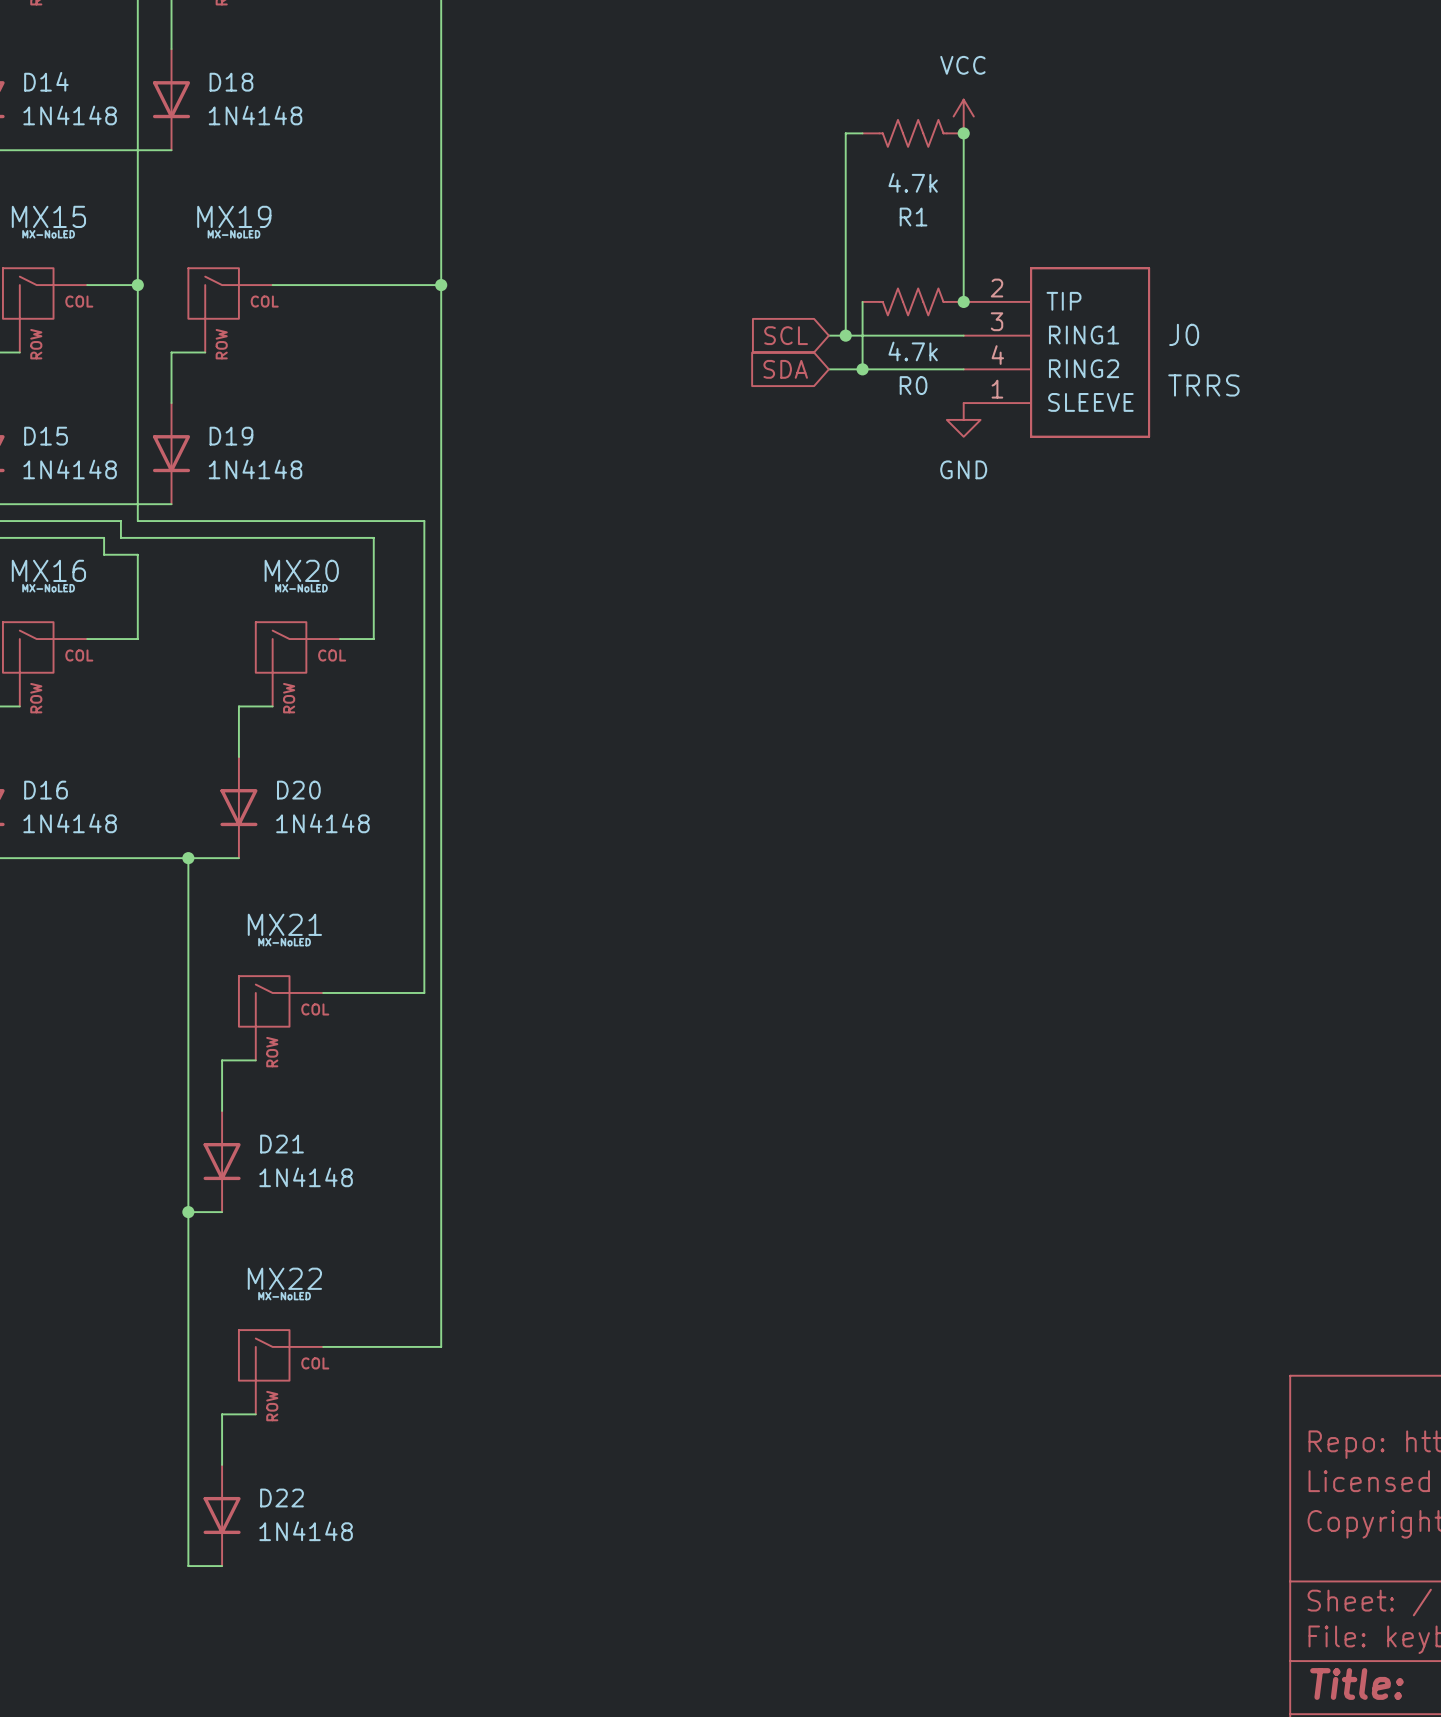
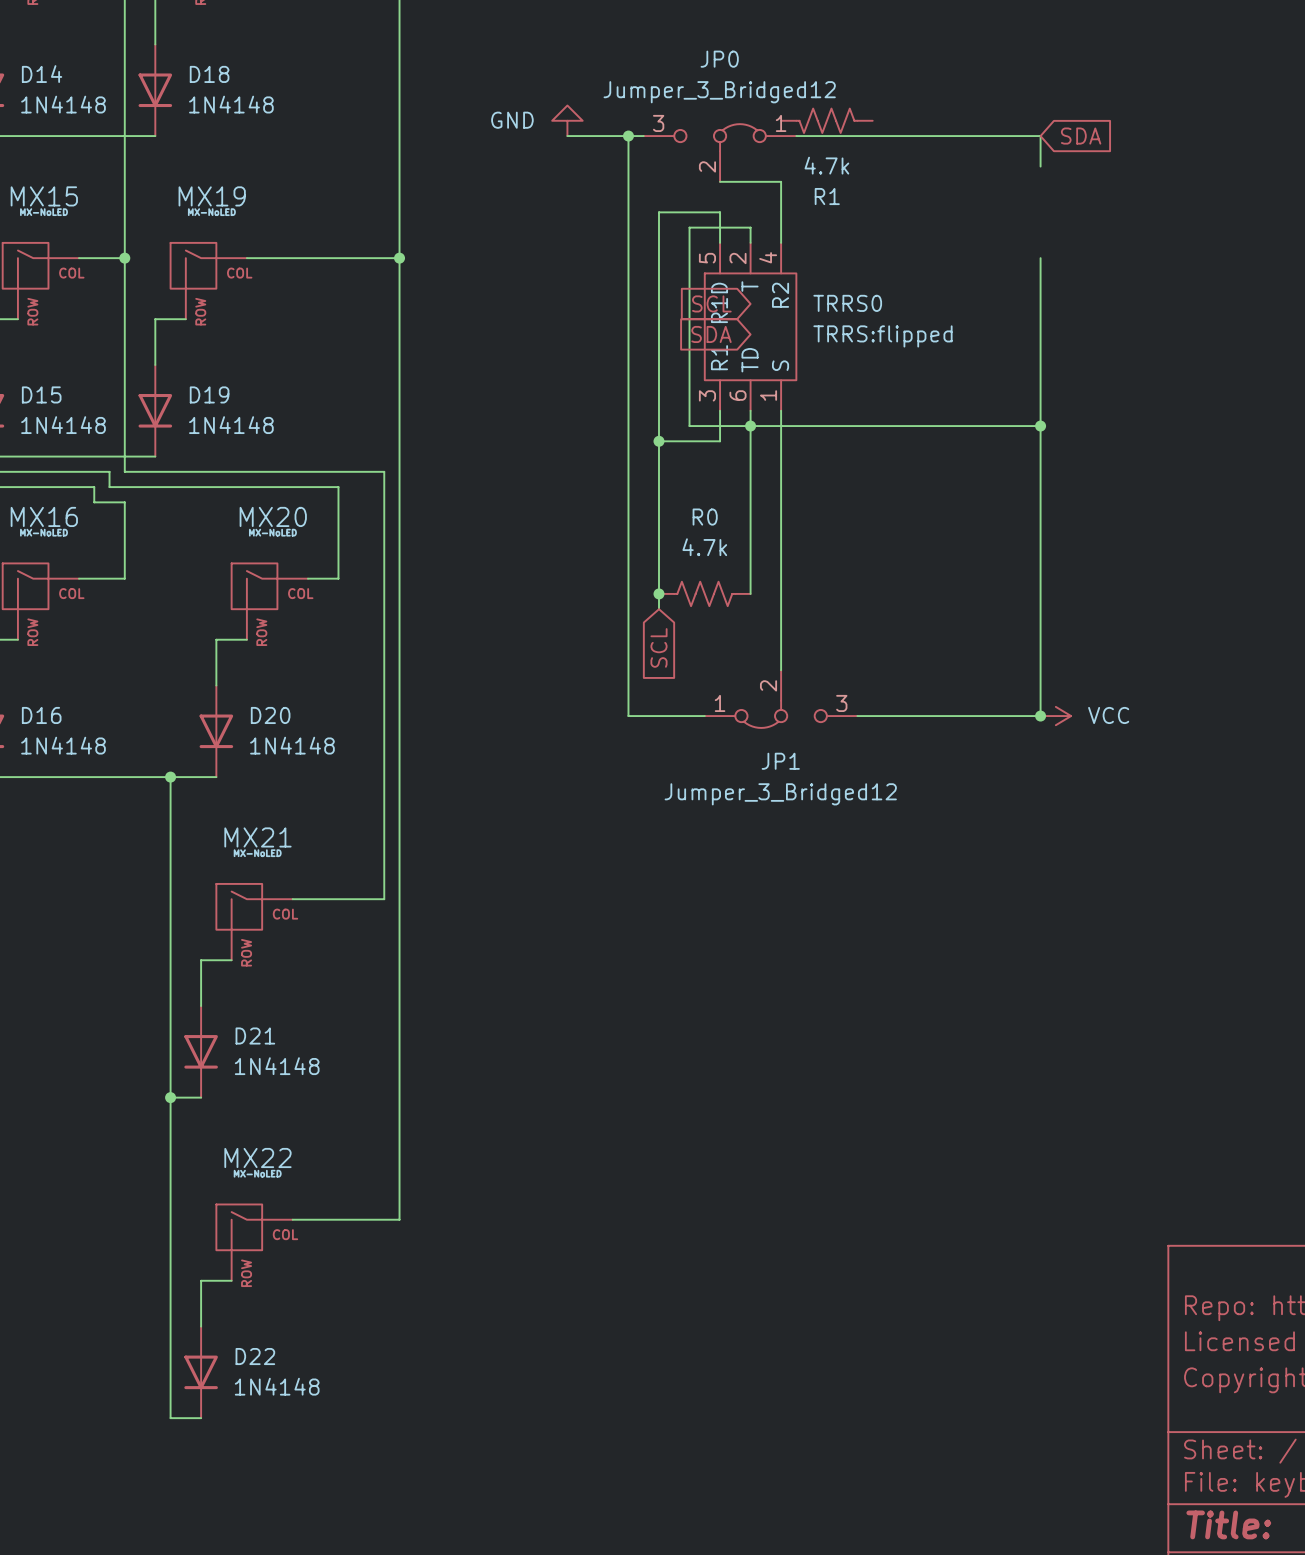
power symbol: VCC (963, 116) -> none
power symbol: none -> GND (567, 120)
wire: (862, 133) (845, 133) (845, 335) -> none
wire: (963, 133) (963, 301) -> none
junction: (963, 133) -> none
wire: none -> (567, 136) (643, 136)
wire: none -> (628, 136) (628, 716) (704, 716)
junction: none -> (628, 136)
wire: none -> (796, 136) (1040, 136) (1040, 166)
global label: none -> SDA (1081, 136)
JP0: none -> Jumper_3_Bridged12 (720, 152)
wire: none -> (720, 181) (781, 181) (781, 242)
wire: none -> (720, 242) (720, 212) (659, 212) (659, 609)
wire: none -> (750, 242) (750, 227) (689, 227) (689, 426) (1040, 426)
wire: none -> (1040, 258) (1040, 716) (857, 716)
wire: (862, 301) (862, 369) -> none
R0 flip: as is (913, 301) -> left-right (704, 593)
R0 position: (913, 301) -> (704, 593)
junction: (963, 301) -> none
wire: (828, 335) (963, 335) -> none
junction: (845, 335) -> none
R0 value position: 4.7k (913, 351) -> 4.7k (704, 547)
J0: TRRS (1056, 352) -> none
TRRS0: none -> TRRS:flipped (750, 326)
wire: (828, 369) (963, 369) -> none
junction: (862, 369) -> none
R0 name position: R0 (913, 385) -> R0 (705, 517)
power symbol: GND (963, 419) -> none
wire: none -> (720, 410) (720, 441) (659, 441)
wire: none -> (750, 410) (750, 593)
wire: none -> (781, 410) (781, 670)
junction: none -> (750, 426)
junction: none -> (1040, 426)
junction: none -> (659, 441)
junction: none -> (659, 593)
global label: none -> SCL (659, 647)
JP1: none -> Jumper_3_Bridged12 (781, 699)
junction: none -> (1040, 716)
power symbol: none -> VCC (1055, 716)

